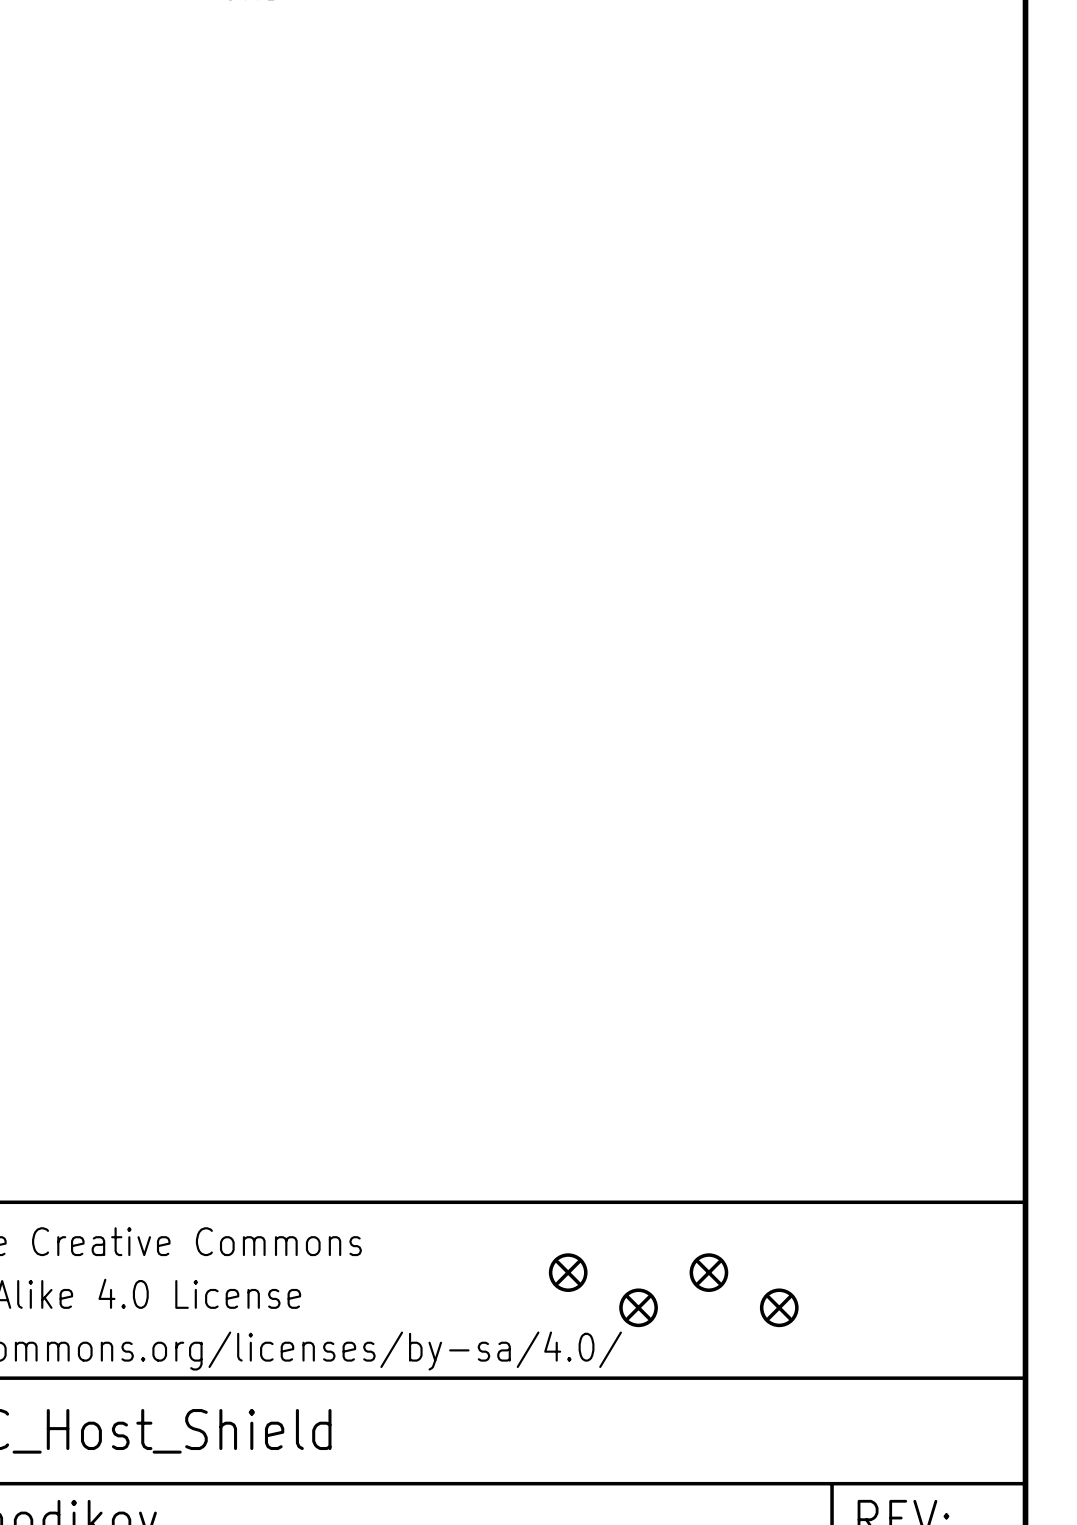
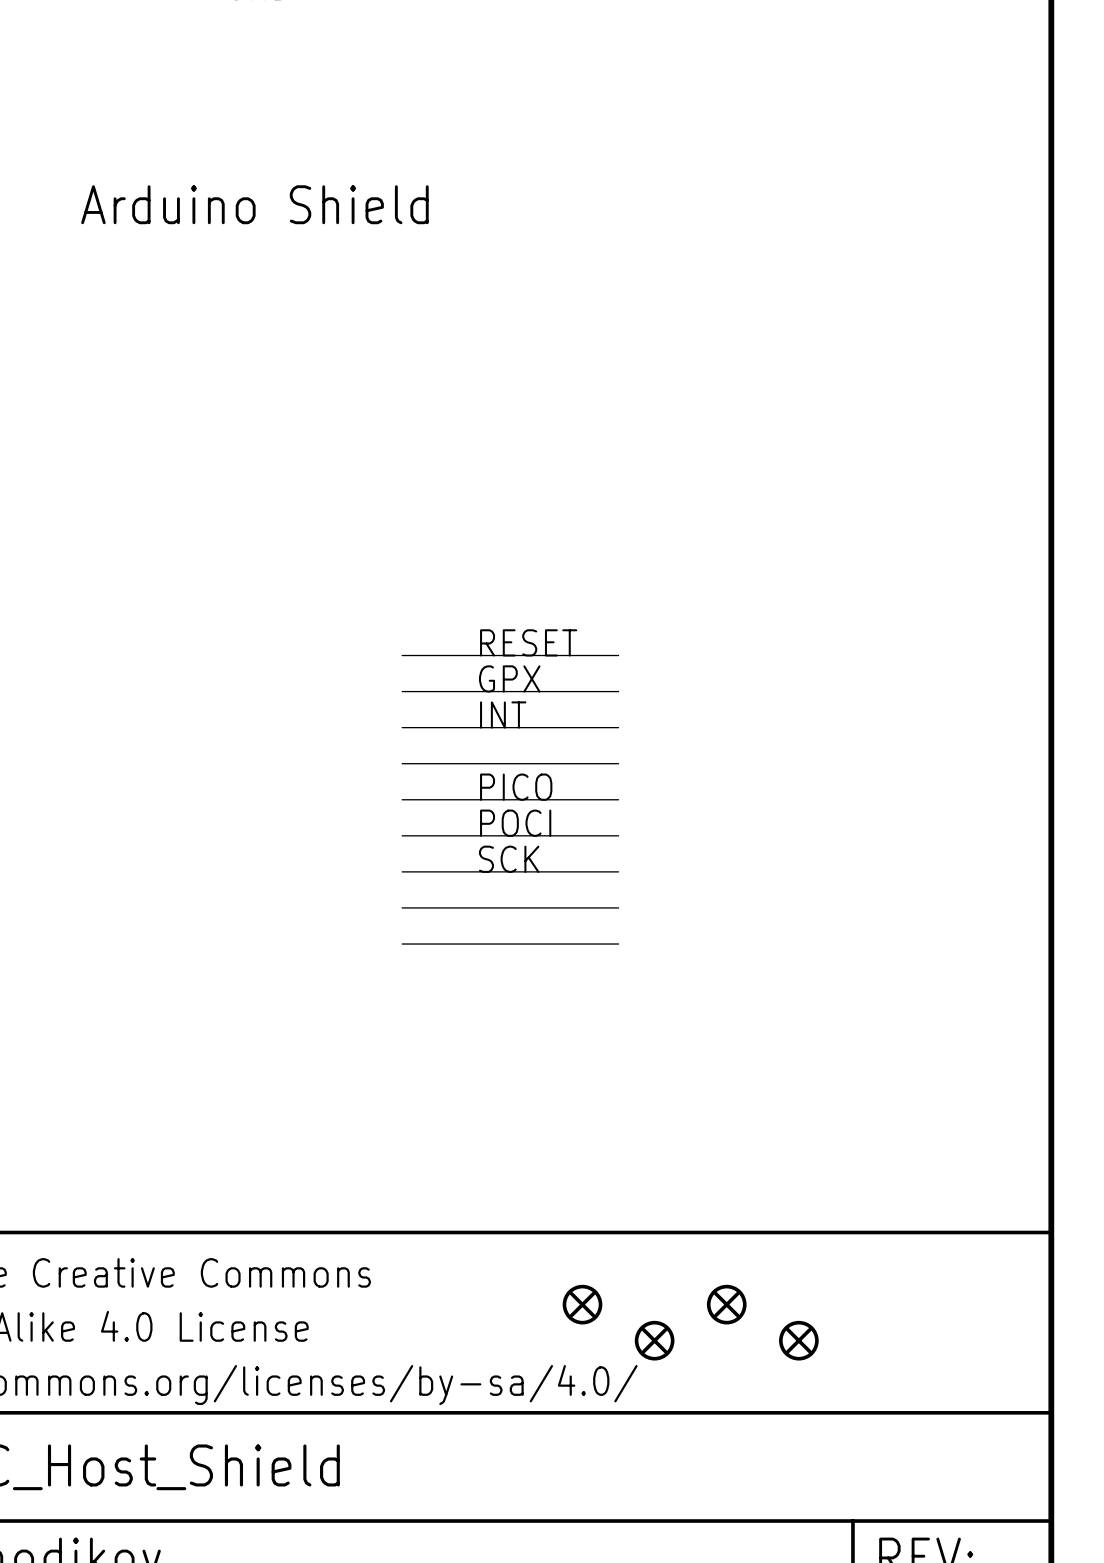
text: none -> Arduino Shield (254, 204)
label: none -> RESET (528, 642)
wire: none -> (402, 655) (618, 655)
label: none -> GPX (509, 678)
wire: none -> (402, 691) (618, 691)
label: none -> INT (503, 715)
wire: none -> (402, 727) (618, 727)
wire: none -> (402, 763) (618, 763)
label: none -> PICO (516, 787)
wire: none -> (402, 799) (618, 799)
label: none -> POCI (515, 823)
wire: none -> (402, 835) (618, 835)
label: none -> SCK (509, 859)
wire: none -> (402, 871) (618, 871)
wire: none -> (402, 907) (618, 907)
wire: none -> (402, 944) (618, 944)

